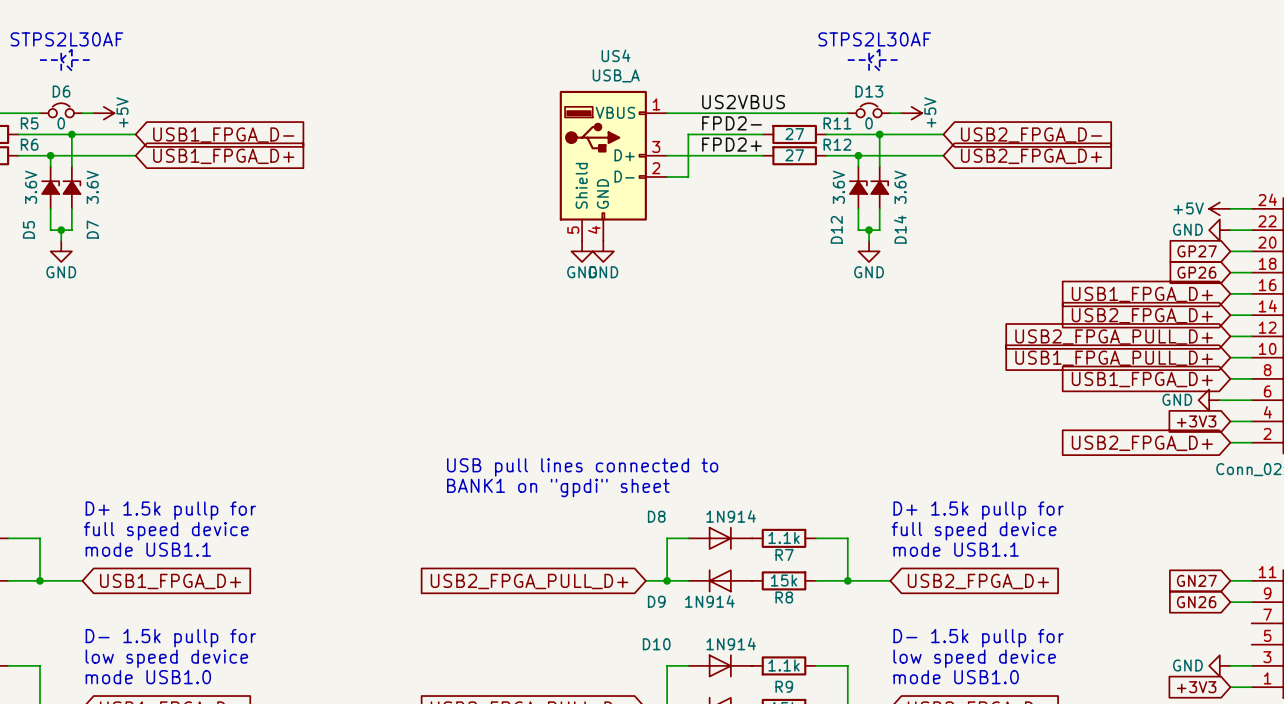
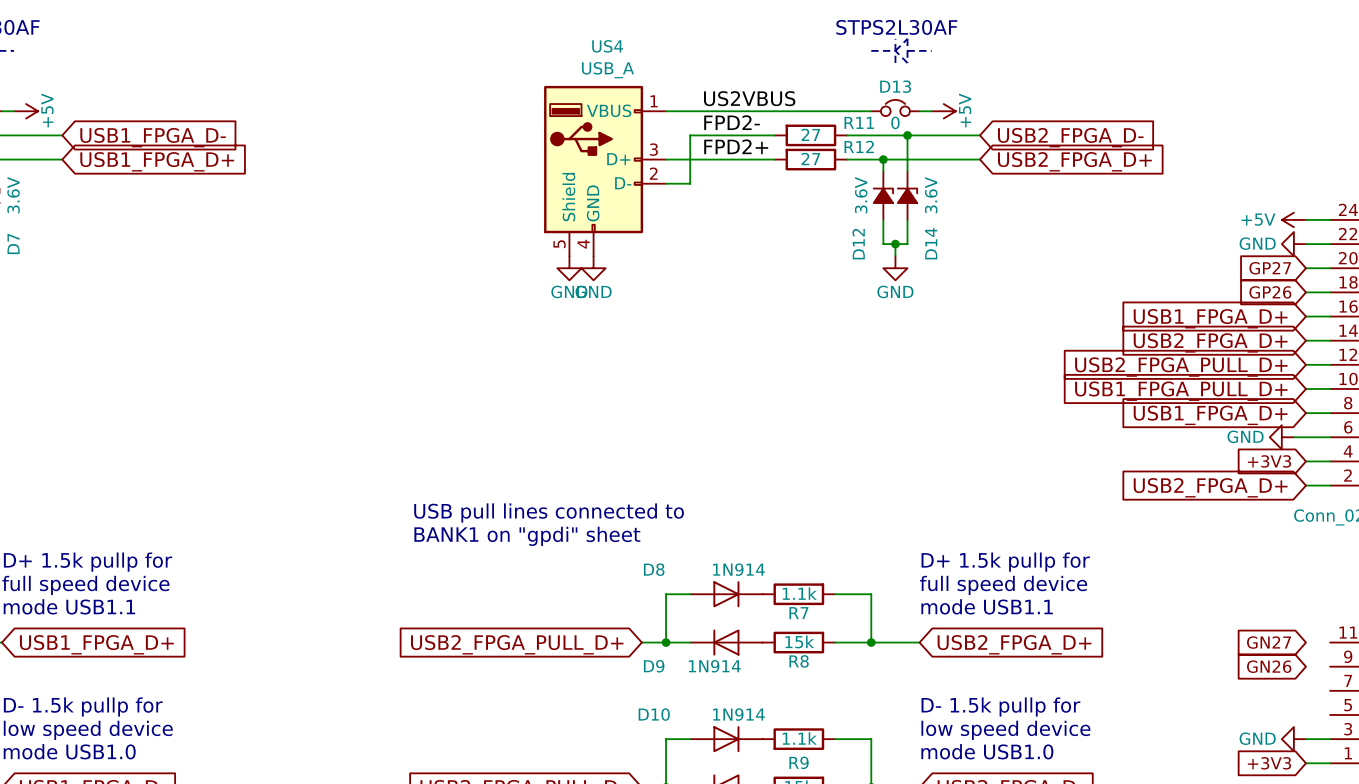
wire: (1230, 580) (1251, 580) -> none
wire: (1230, 602) (1251, 602) -> none

